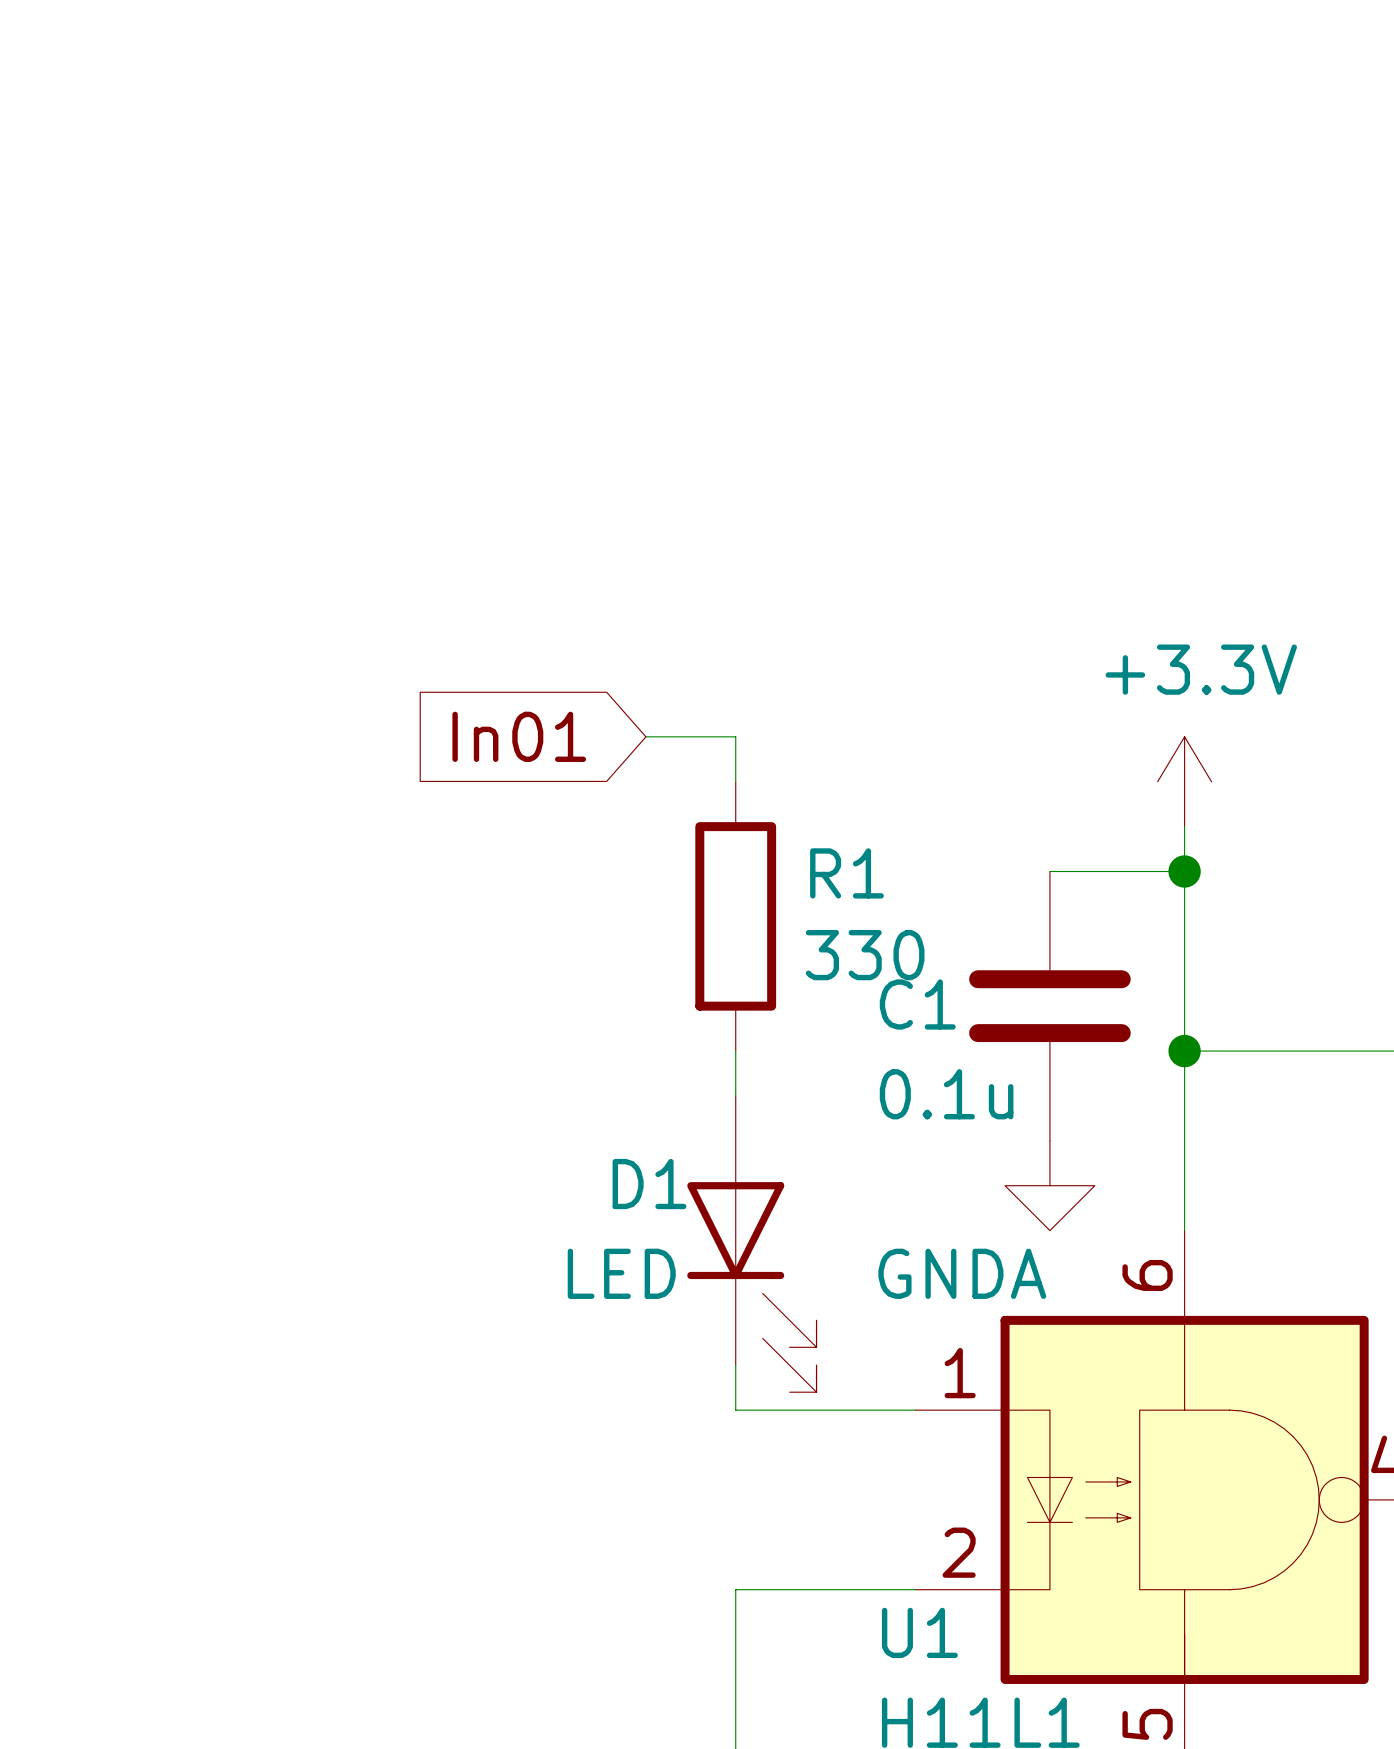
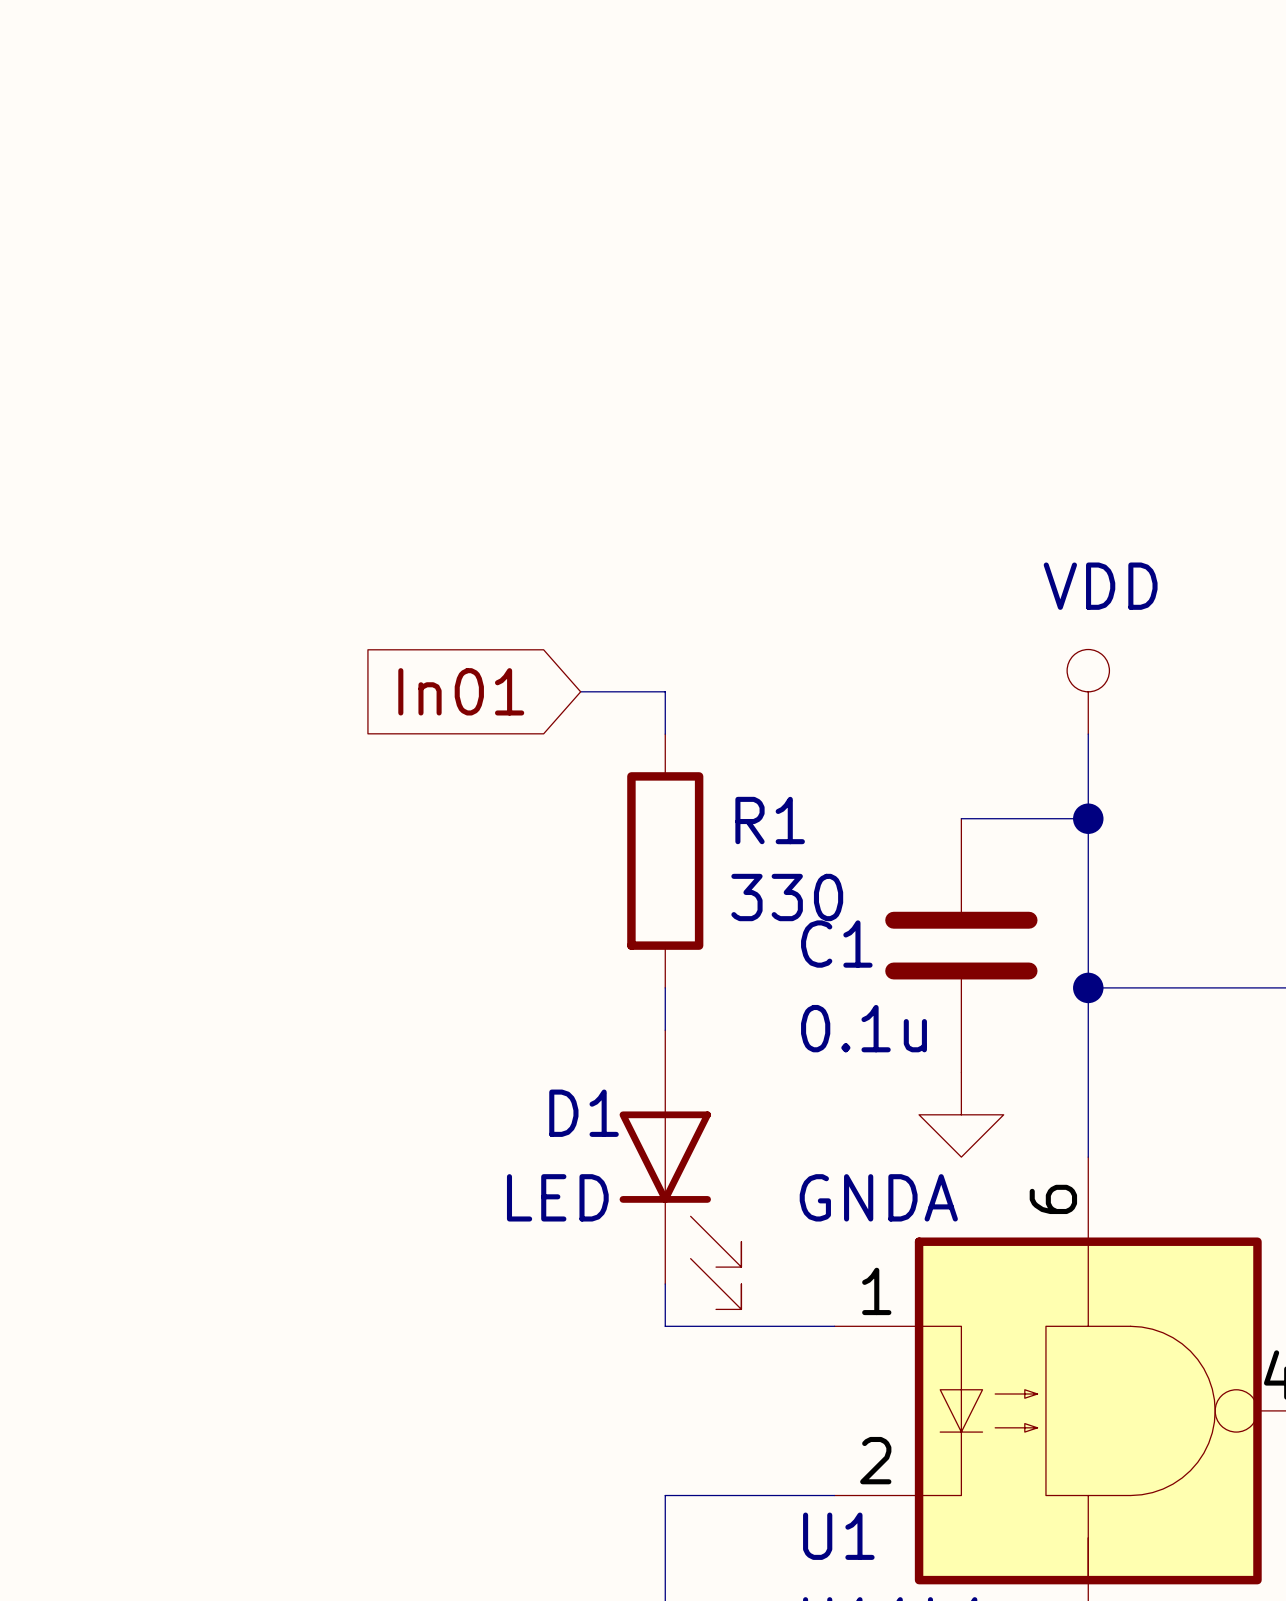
power symbol: none -> VDD (1088, 691)
power symbol: +3.3V (1184, 781) -> none

